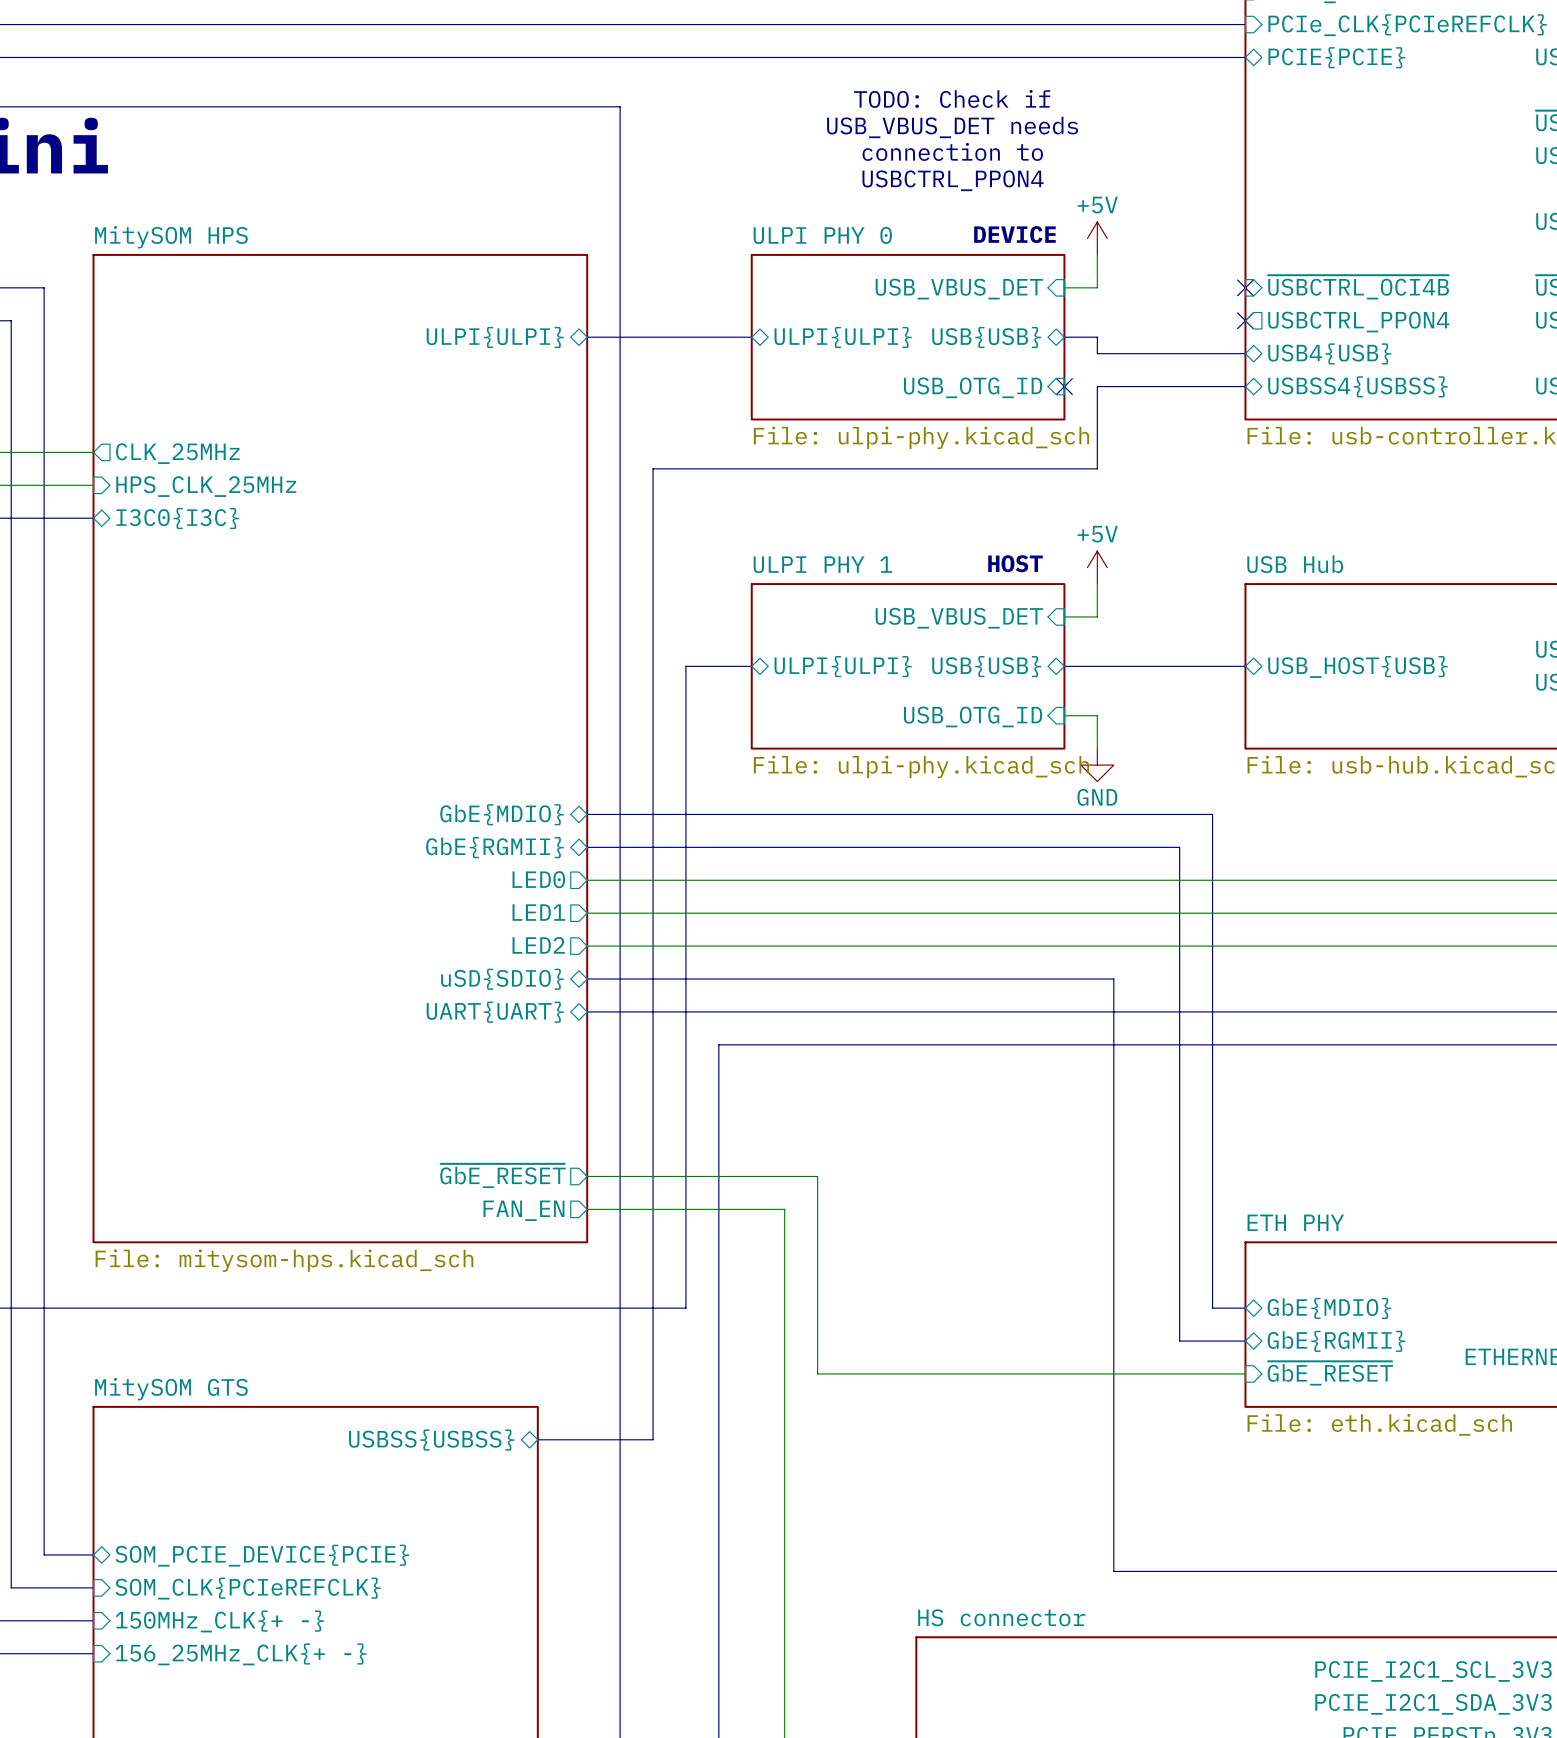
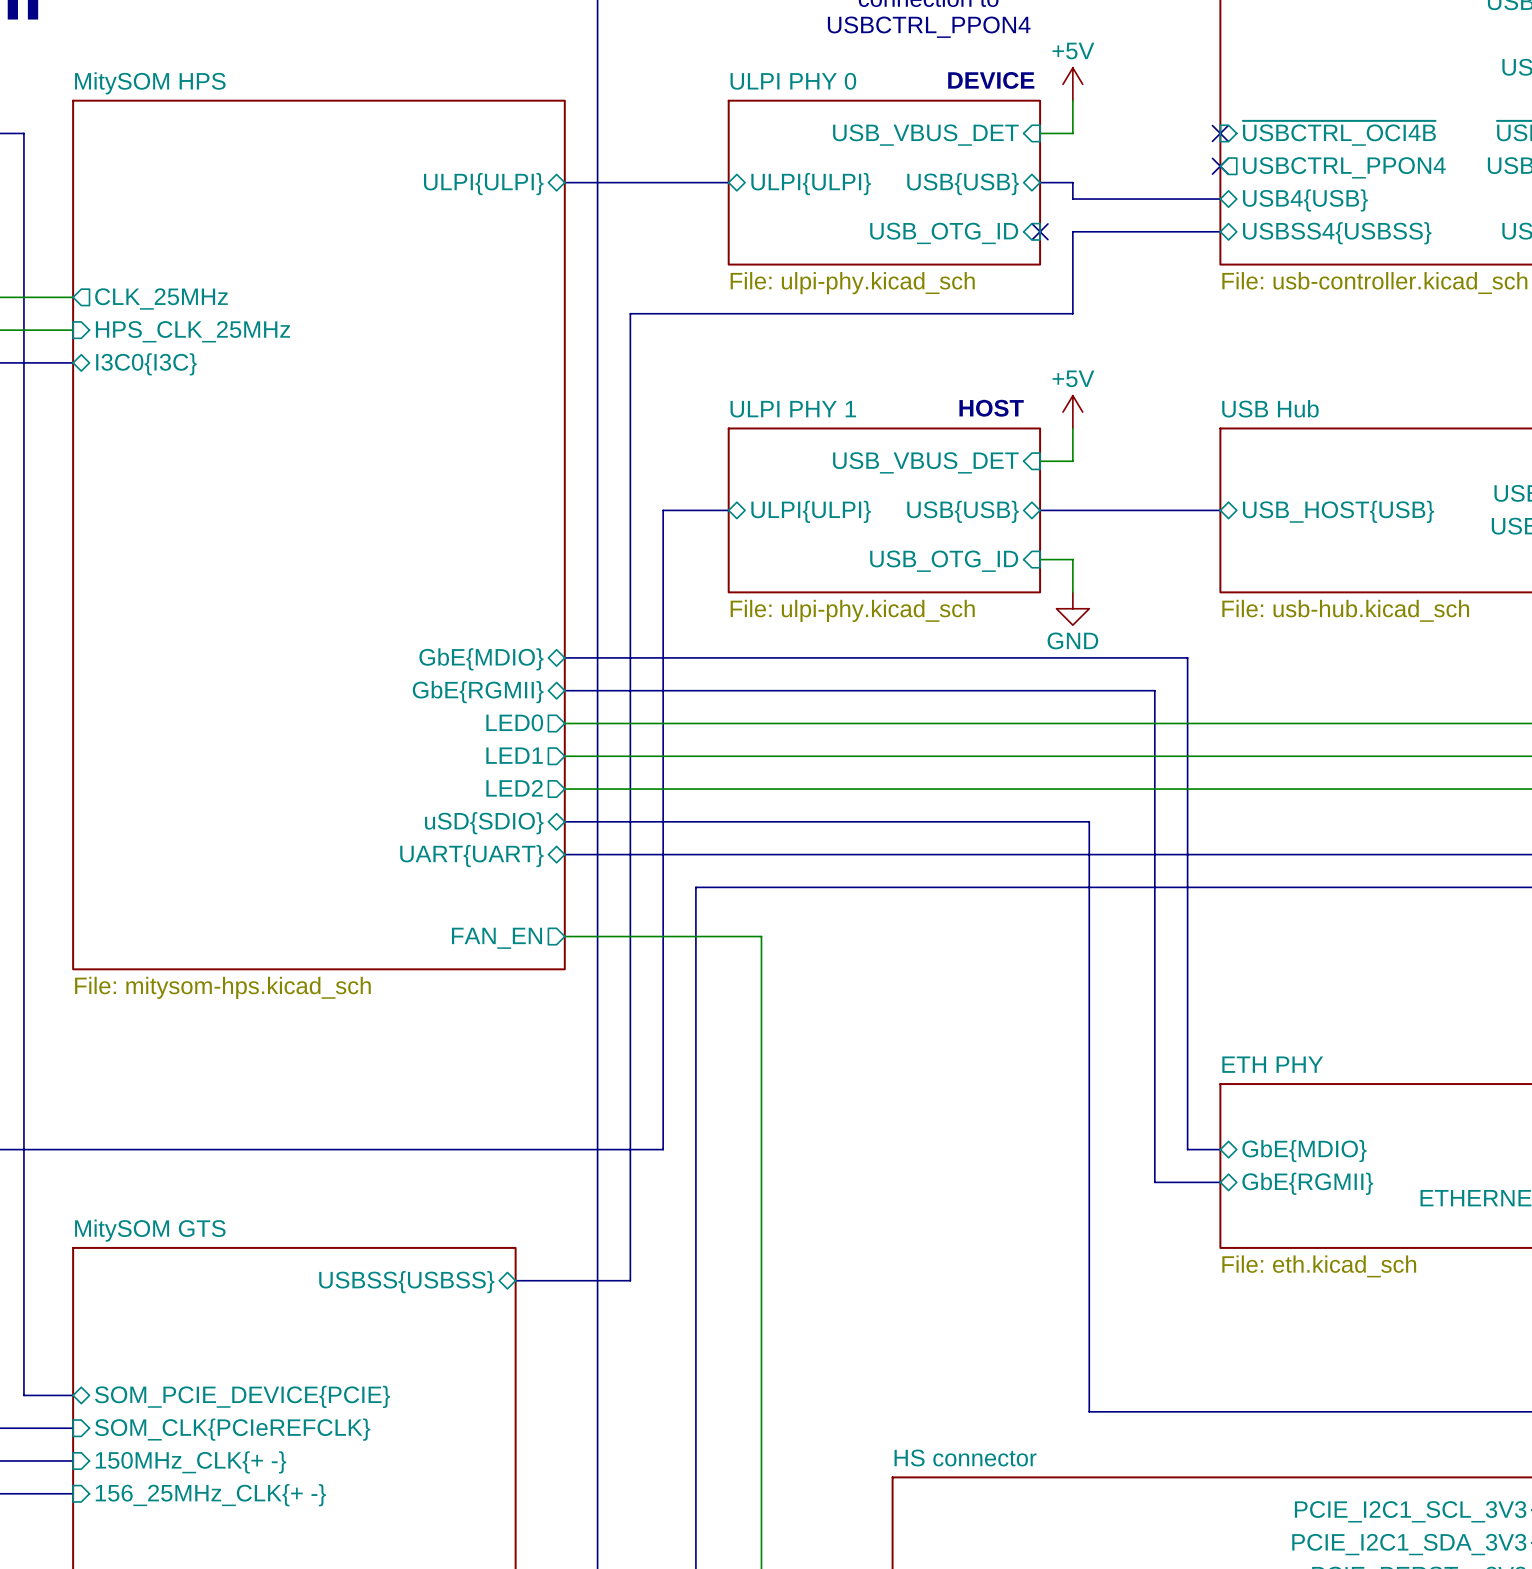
sheet MitySOM HPS: none -> File: mitysom-hps.kicad_sch (318, 535)
sheet MitySOM HPS: File: mitysom-hps.kicad_sch (340, 748) -> none
sheet pin: ~{GbE_RESET} (503, 1175) -> none
wire: (587, 1176) (817, 1176) (817, 1373) (1245, 1373) -> none
wire: (587, 1209) (784, 1209) -> (564, 936) (761, 936) (761, 1051)
sheet pin position: FAN_EN (523, 1210) -> FAN_EN (497, 938)
sheet pin: ~{GbE_RESET} (1330, 1373) -> none

